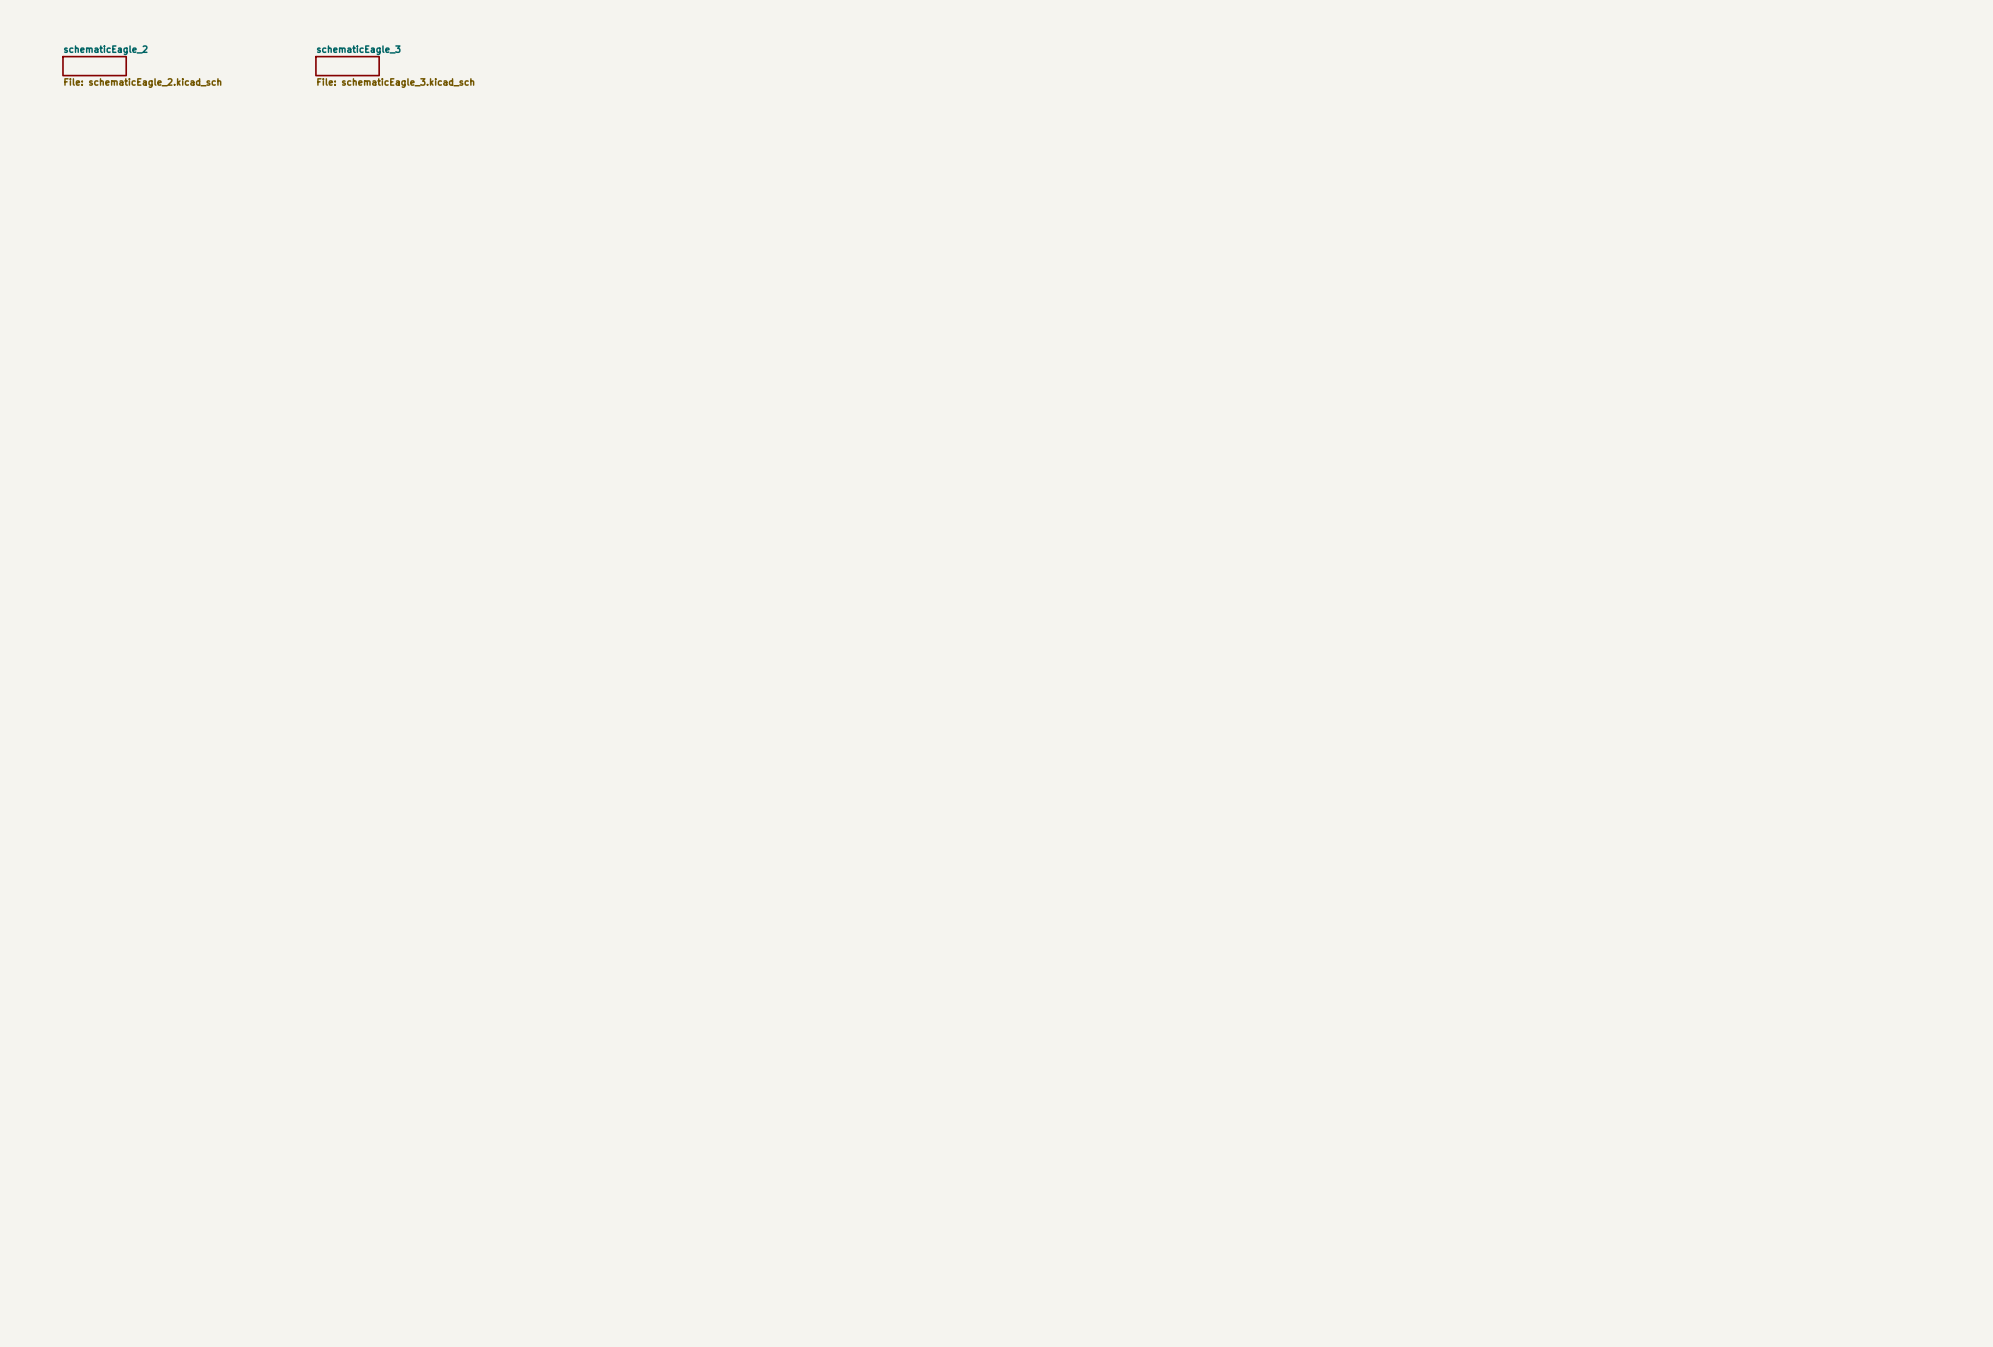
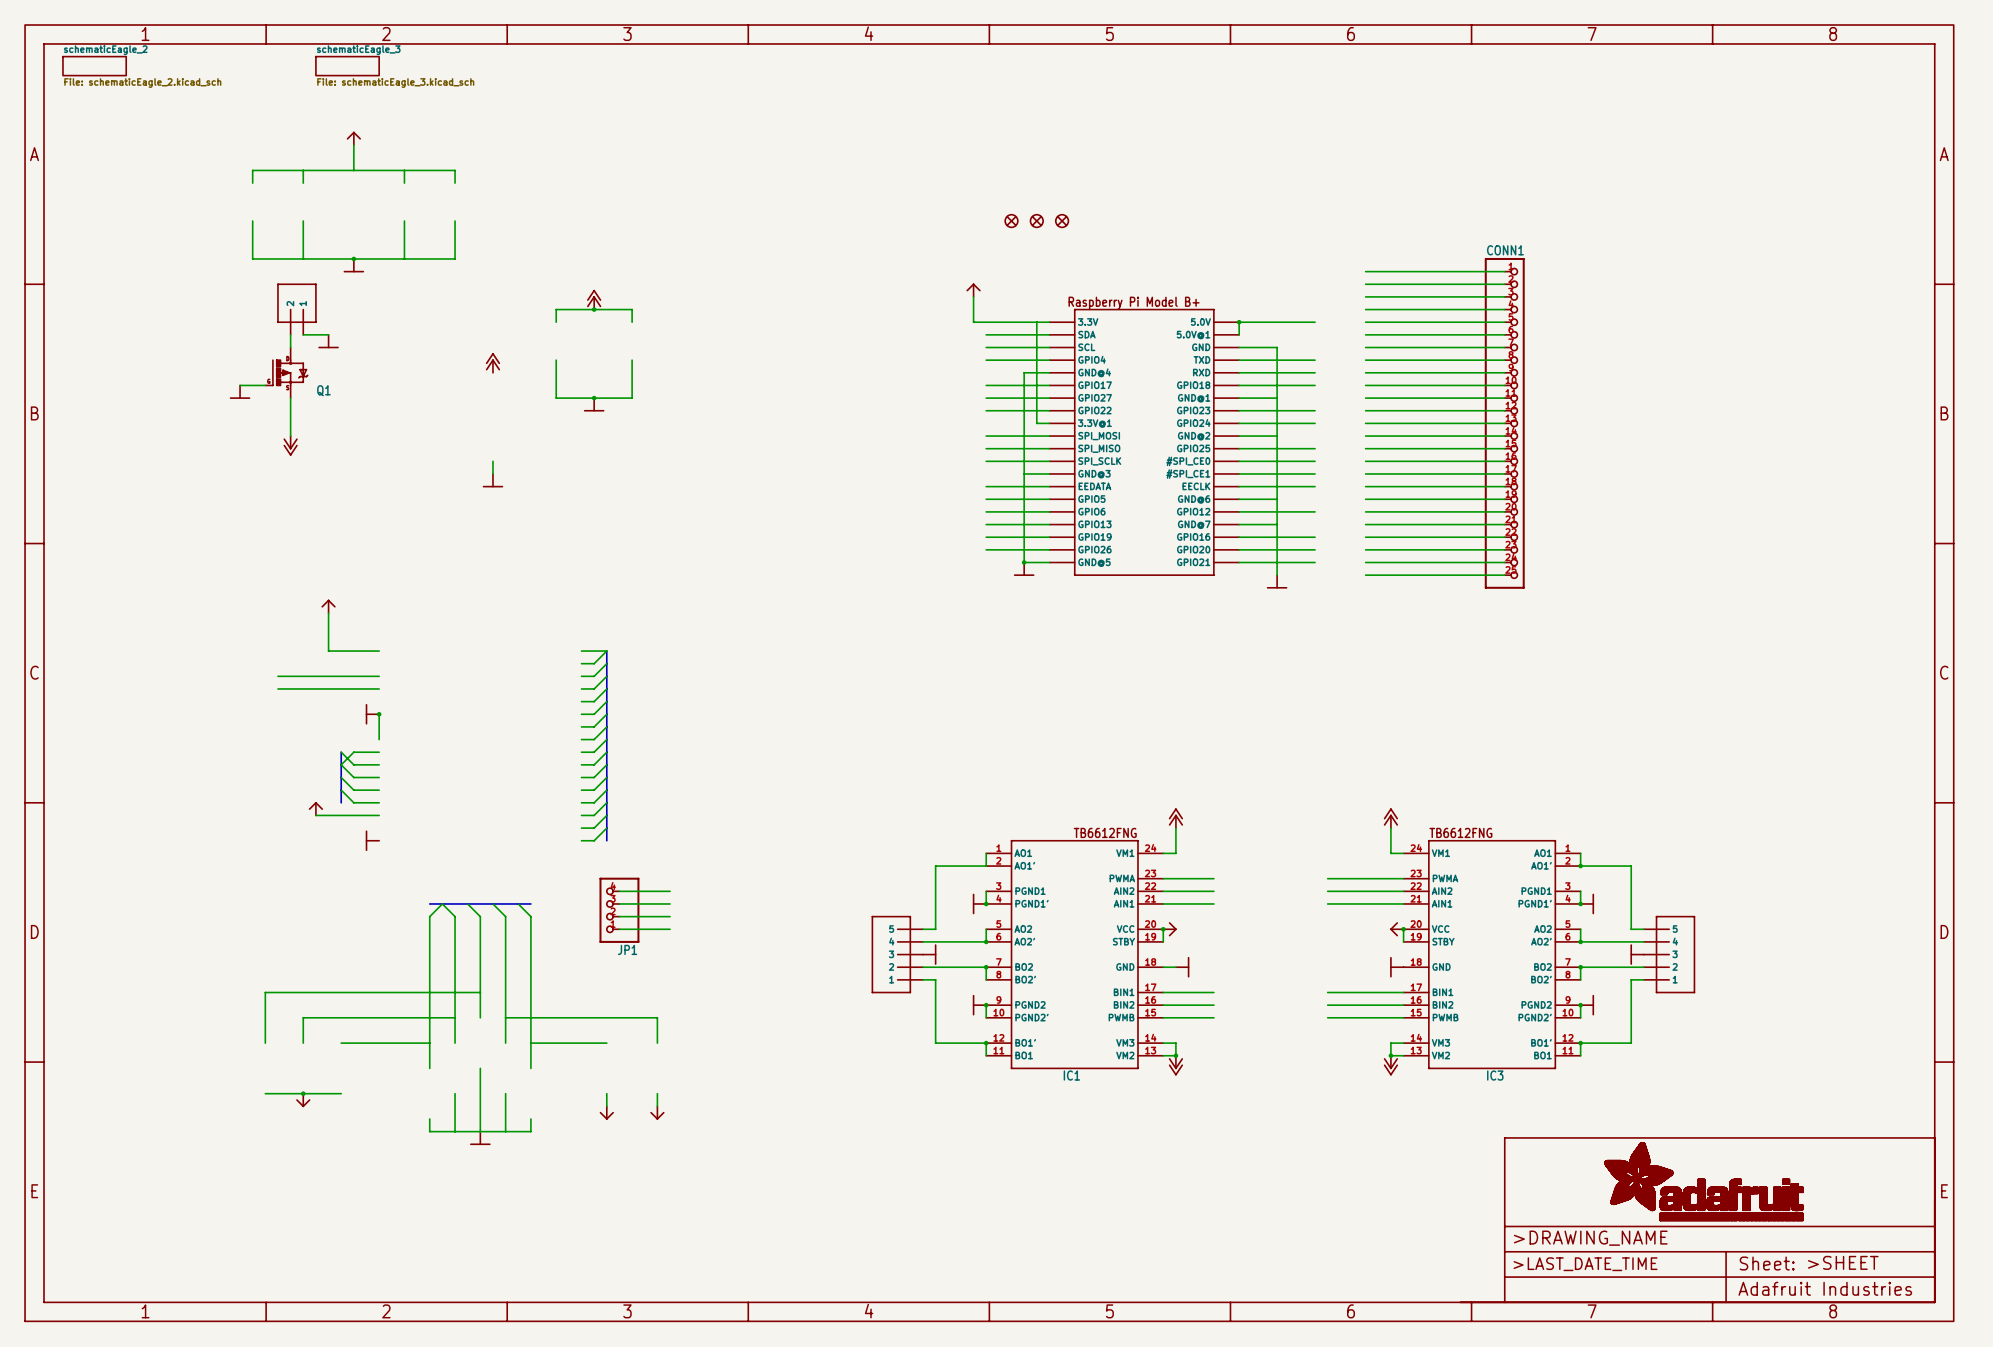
drawing: none -> [25, 25, 1954, 1322]
power symbol: none -> (353, 138)
wire: none -> (353, 145) (353, 170)
wire: none -> (303, 170) (303, 183)
wire: none -> (404, 170) (404, 183)
wire: none -> (252, 183) (252, 170) (455, 170) (455, 183)
wire: none -> (252, 221) (252, 258) (455, 258) (455, 221)
wire: none -> (303, 221) (303, 258)
wire: none -> (404, 221) (404, 258)
part: none -> (1011, 221)
part: none -> (1036, 221)
part: none -> (1062, 221)
junction: none -> (353, 258)
power symbol: none -> (353, 265)
wire: none -> (1365, 271) (1504, 271)
wire: none -> (1365, 284) (1504, 284)
power symbol: none -> (973, 290)
wire: none -> (973, 296) (973, 322) (1049, 322)
wire: none -> (1365, 296) (1504, 296)
power symbol: none -> (594, 299)
part: none -> (296, 309)
junction: none -> (594, 309)
wire: none -> (1365, 309) (1504, 309)
wire: none -> (556, 322) (556, 309) (632, 309) (632, 322)
wire: none -> (1036, 322) (1036, 423) (1049, 423)
junction: none -> (1239, 322)
wire: none -> (1315, 322) (1239, 322) (1239, 334)
wire: none -> (1365, 322) (1504, 322)
wire: none -> (290, 334) (290, 347)
wire: none -> (303, 334) (328, 334)
wire: none -> (986, 334) (1049, 334)
wire: none -> (1365, 334) (1504, 334)
power symbol: none -> (328, 341)
wire: none -> (986, 347) (1049, 347)
wire: none -> (1239, 347) (1277, 347) (1277, 575)
wire: none -> (1365, 347) (1504, 347)
wire: none -> (556, 360) (556, 398) (632, 398) (632, 360)
wire: none -> (986, 360) (1049, 360)
wire: none -> (1239, 360) (1315, 360)
wire: none -> (1365, 360) (1504, 360)
power symbol: none -> (492, 363)
Q1: none -> (286, 372)
wire: none -> (1049, 372) (1024, 372) (1024, 562) (1049, 562)
wire: none -> (1239, 372) (1315, 372)
wire: none -> (1365, 372) (1504, 372)
wire: none -> (240, 385) (265, 385)
wire: none -> (986, 385) (1049, 385)
wire: none -> (1239, 385) (1315, 385)
wire: none -> (1365, 385) (1504, 385)
power symbol: none -> (240, 392)
wire: none -> (290, 398) (290, 436)
junction: none -> (594, 398)
wire: none -> (986, 398) (1049, 398)
wire: none -> (1239, 398) (1277, 398)
wire: none -> (1365, 398) (1504, 398)
power symbol: none -> (594, 404)
wire: none -> (986, 410) (1049, 410)
wire: none -> (1239, 410) (1315, 410)
wire: none -> (1365, 410) (1504, 410)
wire: none -> (1239, 423) (1315, 423)
wire: none -> (1365, 423) (1504, 423)
CONN1: none -> (1504, 423)
wire: none -> (986, 436) (1049, 436)
wire: none -> (1239, 436) (1277, 436)
wire: none -> (1365, 436) (1504, 436)
part: none -> (1144, 442)
power symbol: none -> (290, 445)
wire: none -> (986, 448) (1049, 448)
wire: none -> (1239, 448) (1315, 448)
wire: none -> (1365, 448) (1504, 448)
wire: none -> (492, 461) (492, 473)
wire: none -> (986, 461) (1049, 461)
wire: none -> (1239, 461) (1315, 461)
wire: none -> (1365, 461) (1504, 461)
wire: none -> (1024, 473) (1049, 473)
wire: none -> (1239, 473) (1315, 473)
wire: none -> (1365, 473) (1504, 473)
power symbol: none -> (492, 480)
wire: none -> (986, 486) (1049, 486)
wire: none -> (1239, 486) (1315, 486)
wire: none -> (1365, 486) (1504, 486)
wire: none -> (986, 499) (1049, 499)
wire: none -> (1239, 499) (1277, 499)
wire: none -> (1365, 499) (1504, 499)
wire: none -> (986, 511) (1049, 511)
wire: none -> (1239, 511) (1315, 511)
wire: none -> (1365, 511) (1504, 511)
wire: none -> (986, 524) (1049, 524)
wire: none -> (1239, 524) (1277, 524)
wire: none -> (1365, 524) (1504, 524)
wire: none -> (986, 537) (1049, 537)
wire: none -> (1239, 537) (1315, 537)
wire: none -> (1365, 537) (1504, 537)
wire: none -> (986, 549) (1049, 549)
wire: none -> (1239, 549) (1315, 549)
wire: none -> (1365, 549) (1504, 549)
junction: none -> (1024, 562)
wire: none -> (1239, 562) (1315, 562)
wire: none -> (1365, 562) (1504, 562)
power symbol: none -> (1024, 569)
wire: none -> (1365, 575) (1504, 575)
power symbol: none -> (1277, 581)
power symbol: none -> (328, 606)
wire: none -> (328, 613) (328, 651) (379, 651)
wire: none -> (581, 651) (606, 651) (594, 663) (581, 663)
bus: none -> (606, 651) (606, 840)
wire: none -> (606, 663) (594, 676) (581, 676)
wire: none -> (277, 676) (379, 676)
wire: none -> (606, 676) (594, 688) (581, 688)
wire: none -> (277, 688) (379, 688)
wire: none -> (606, 688) (594, 701) (581, 701)
wire: none -> (606, 701) (594, 714) (581, 714)
power symbol: none -> (372, 714)
wire: none -> (379, 714) (379, 739)
junction: none -> (379, 714)
wire: none -> (606, 714) (594, 726) (581, 726)
wire: none -> (606, 726) (594, 739) (581, 739)
wire: none -> (606, 739) (594, 752) (581, 752)
wire: none -> (341, 752) (353, 764) (379, 764)
bus: none -> (341, 752) (341, 802)
wire: none -> (379, 752) (353, 752) (341, 764) (353, 777) (379, 777)
wire: none -> (606, 752) (594, 764) (581, 764)
wire: none -> (606, 764) (594, 777) (581, 777)
wire: none -> (341, 777) (353, 790) (379, 790)
wire: none -> (606, 777) (594, 790) (581, 790)
wire: none -> (341, 790) (353, 802) (379, 802)
wire: none -> (606, 790) (594, 802) (581, 802)
wire: none -> (606, 802) (594, 815) (581, 815)
power symbol: none -> (315, 808)
wire: none -> (315, 815) (379, 815)
wire: none -> (606, 815) (594, 828) (581, 828)
power symbol: none -> (1175, 818)
power symbol: none -> (1390, 818)
wire: none -> (606, 828) (594, 840) (581, 840)
wire: none -> (1175, 828) (1175, 853) (1163, 853)
wire: none -> (1390, 828) (1390, 853) (1403, 853)
power symbol: none -> (372, 840)
wire: none -> (986, 853) (986, 866) (935, 866) (935, 929) (922, 929)
wire: none -> (1580, 853) (1580, 866) (1631, 866) (1631, 929) (1643, 929)
junction: none -> (1580, 866)
wire: none -> (1163, 878) (1213, 878)
wire: none -> (1327, 878) (1403, 878)
wire: none -> (619, 891) (670, 891)
wire: none -> (986, 891) (986, 903)
wire: none -> (1163, 891) (1213, 891)
wire: none -> (1327, 891) (1403, 891)
wire: none -> (1580, 891) (1580, 903)
bus: none -> (429, 903) (530, 903)
wire: none -> (467, 903) (480, 916) (480, 1017)
wire: none -> (492, 903) (505, 916) (505, 1043)
wire: none -> (518, 903) (530, 916) (530, 1068)
wire: none -> (619, 903) (670, 903)
power symbol: none -> (979, 903)
junction: none -> (986, 903)
wire: none -> (1163, 903) (1213, 903)
wire: none -> (1327, 903) (1403, 903)
junction: none -> (1580, 903)
power symbol: none -> (1587, 903)
JP1: none -> (619, 910)
wire: none -> (619, 916) (670, 916)
wire: none -> (619, 929) (670, 929)
wire: none -> (986, 929) (986, 941) (922, 941)
wire: none -> (1163, 929) (1163, 941)
junction: none -> (1163, 929)
power symbol: none -> (1169, 929)
power symbol: none -> (1396, 929)
wire: none -> (1403, 929) (1403, 941)
junction: none -> (1403, 929)
wire: none -> (1580, 929) (1580, 941) (1643, 941)
junction: none -> (986, 941)
junction: none -> (1580, 941)
part: none -> (897, 954)
power symbol: none -> (929, 954)
IC1: none -> (1074, 954)
IC3: none -> (1492, 954)
power symbol: none -> (1637, 954)
part: none -> (1669, 954)
wire: none -> (922, 967) (986, 967) (986, 979)
junction: none -> (986, 967)
wire: none -> (1163, 967) (1175, 967)
power symbol: none -> (1182, 967)
power symbol: none -> (1396, 967)
junction: none -> (1580, 967)
wire: none -> (1643, 967) (1580, 967) (1580, 979)
wire: none -> (922, 979) (935, 979) (935, 1043) (986, 1043) (986, 1055)
wire: none -> (1643, 979) (1631, 979) (1631, 1043) (1580, 1043) (1580, 1055)
wire: none -> (480, 992) (265, 992) (265, 1043)
wire: none -> (1163, 992) (1213, 992)
wire: none -> (1327, 992) (1403, 992)
power symbol: none -> (979, 1005)
wire: none -> (986, 1005) (986, 1017)
junction: none -> (986, 1005)
wire: none -> (1163, 1005) (1213, 1005)
wire: none -> (1327, 1005) (1403, 1005)
wire: none -> (1580, 1005) (1580, 1017)
junction: none -> (1580, 1005)
power symbol: none -> (1587, 1005)
wire: none -> (455, 1017) (303, 1017) (303, 1043)
wire: none -> (505, 1017) (657, 1017) (657, 1043)
wire: none -> (1163, 1017) (1213, 1017)
wire: none -> (1327, 1017) (1403, 1017)
wire: none -> (341, 1043) (429, 1043)
wire: none -> (455, 1043) (455, 916) (442, 903) (429, 916) (429, 1068)
wire: none -> (530, 1043) (606, 1043)
junction: none -> (986, 1043)
wire: none -> (1163, 1043) (1175, 1043) (1175, 1055) (1163, 1055)
wire: none -> (1403, 1043) (1390, 1043) (1390, 1055) (1403, 1055)
junction: none -> (1580, 1043)
junction: none -> (1175, 1055)
junction: none -> (1390, 1055)
power symbol: none -> (1175, 1065)
power symbol: none -> (1390, 1065)
wire: none -> (480, 1068) (480, 1131)
wire: none -> (265, 1093) (341, 1093)
junction: none -> (303, 1093)
wire: none -> (455, 1093) (455, 1131)
wire: none -> (505, 1093) (505, 1131)
wire: none -> (606, 1093) (606, 1106)
wire: none -> (657, 1093) (657, 1106)
power symbol: none -> (303, 1100)
power symbol: none -> (606, 1112)
power symbol: none -> (657, 1112)
wire: none -> (429, 1118) (429, 1131) (530, 1131) (530, 1118)
power symbol: none -> (480, 1138)

